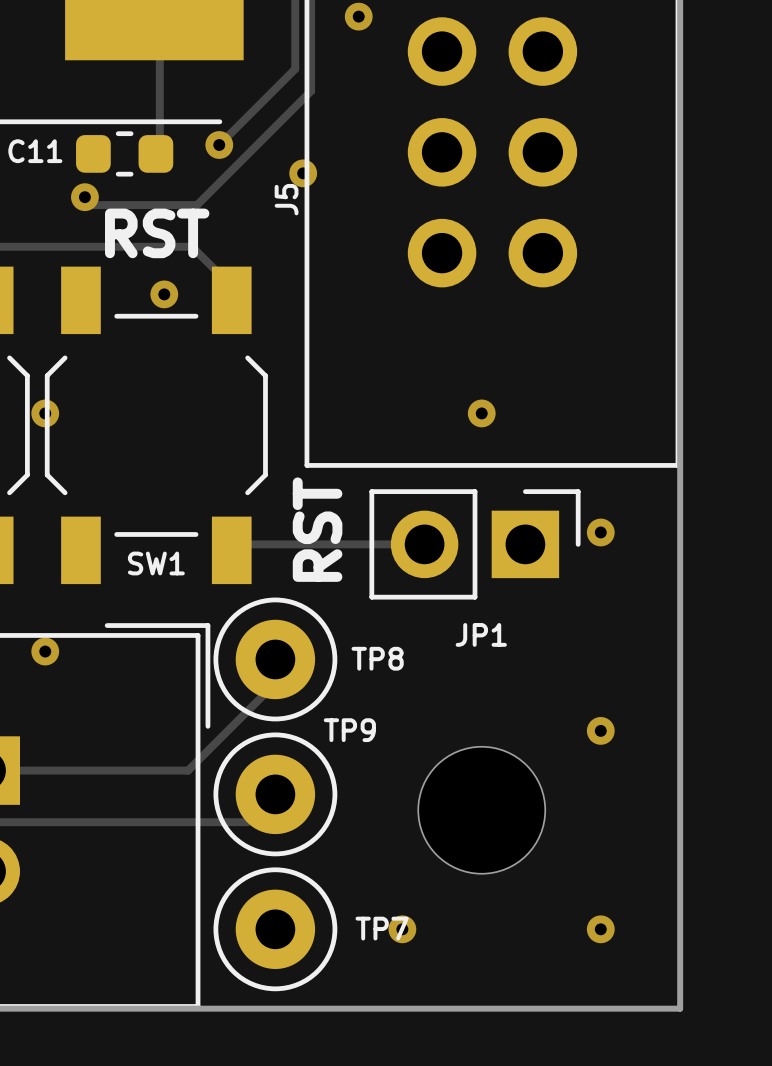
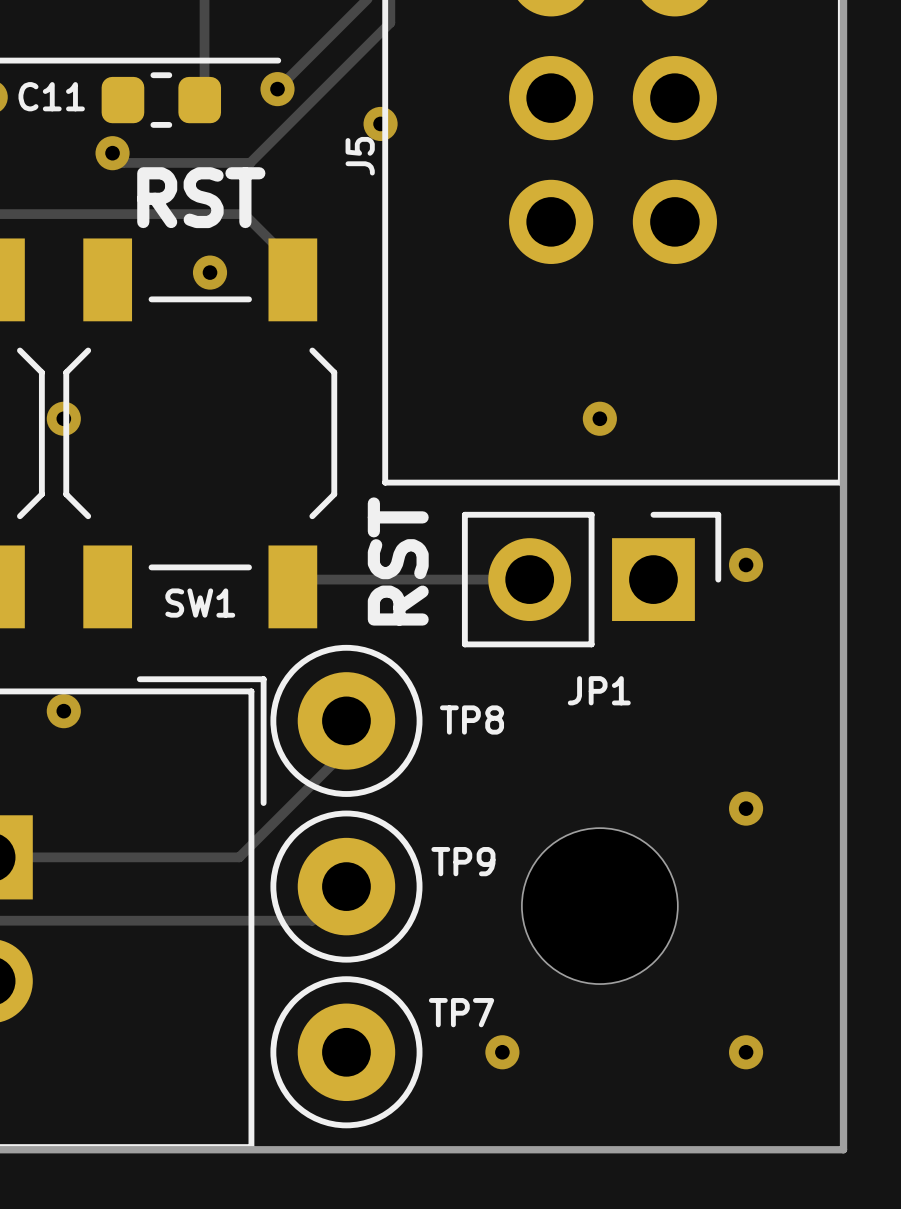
TP9 name position: TP9 (349, 730) -> TP9 (463, 861)
TP7 name position: TP7 (382, 928) -> TP7 (461, 1012)

